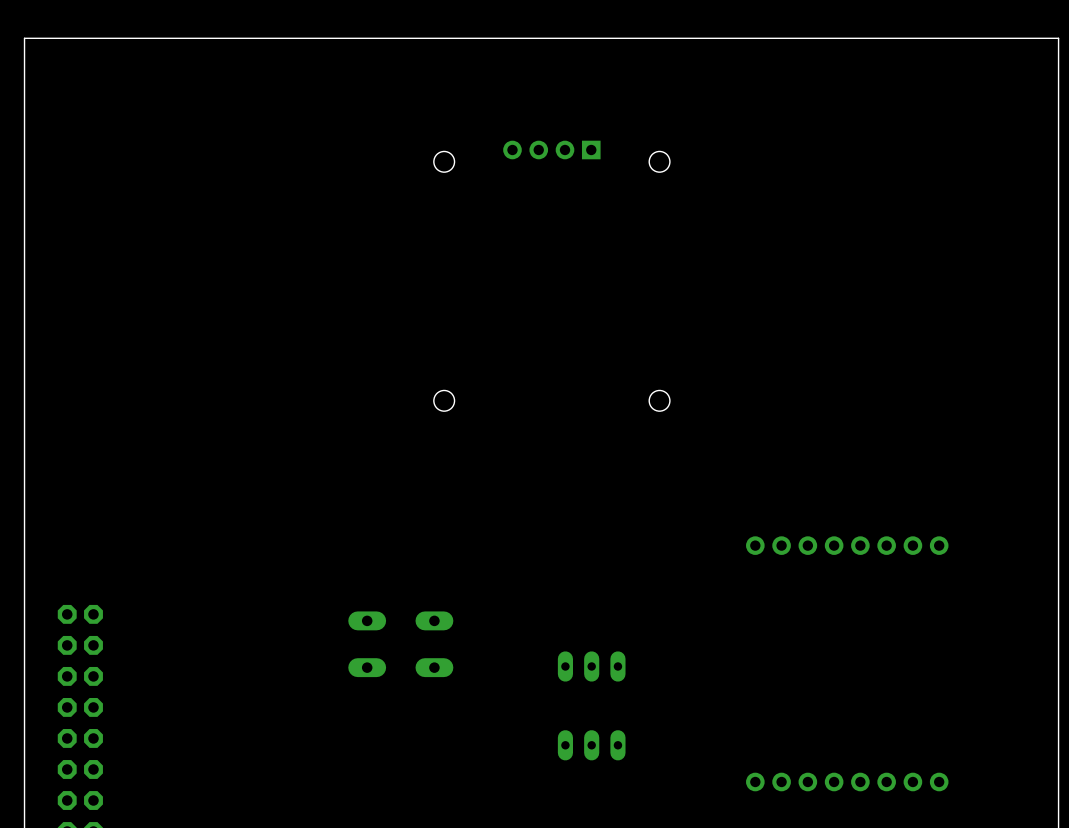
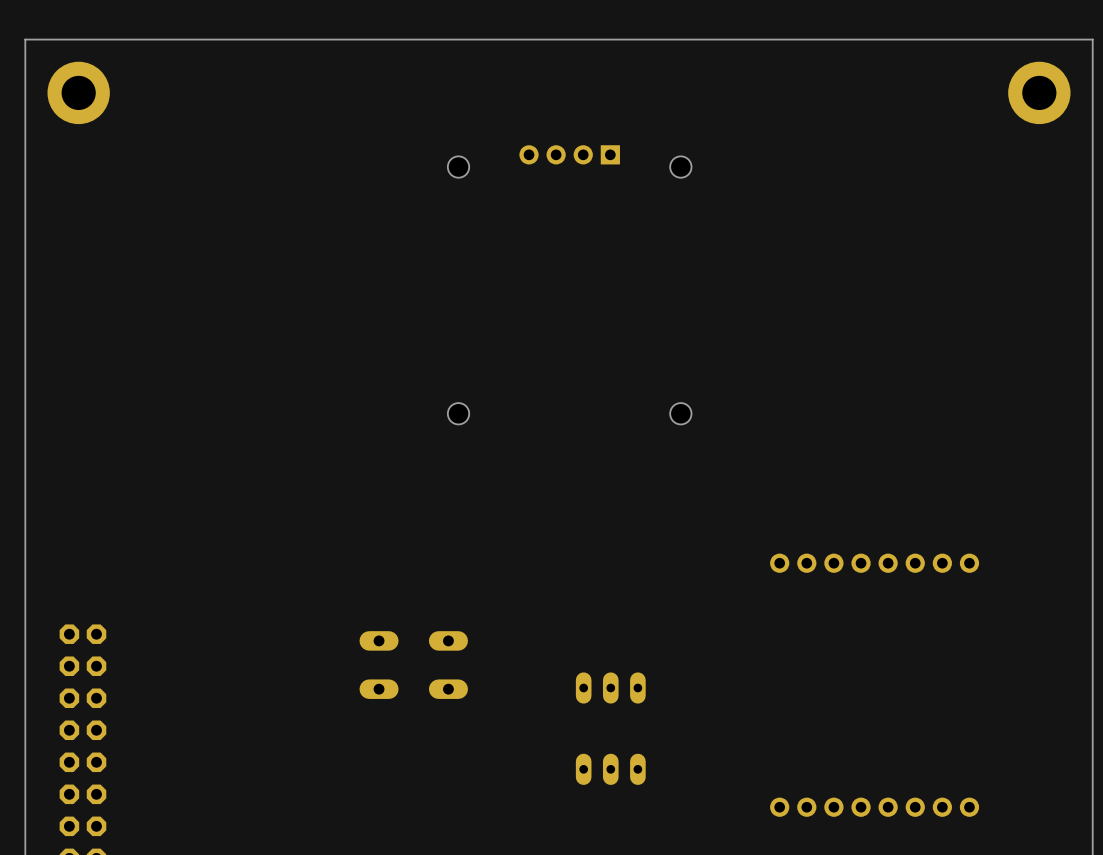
part: none -> (78, 92)
part: none -> (1039, 92)

